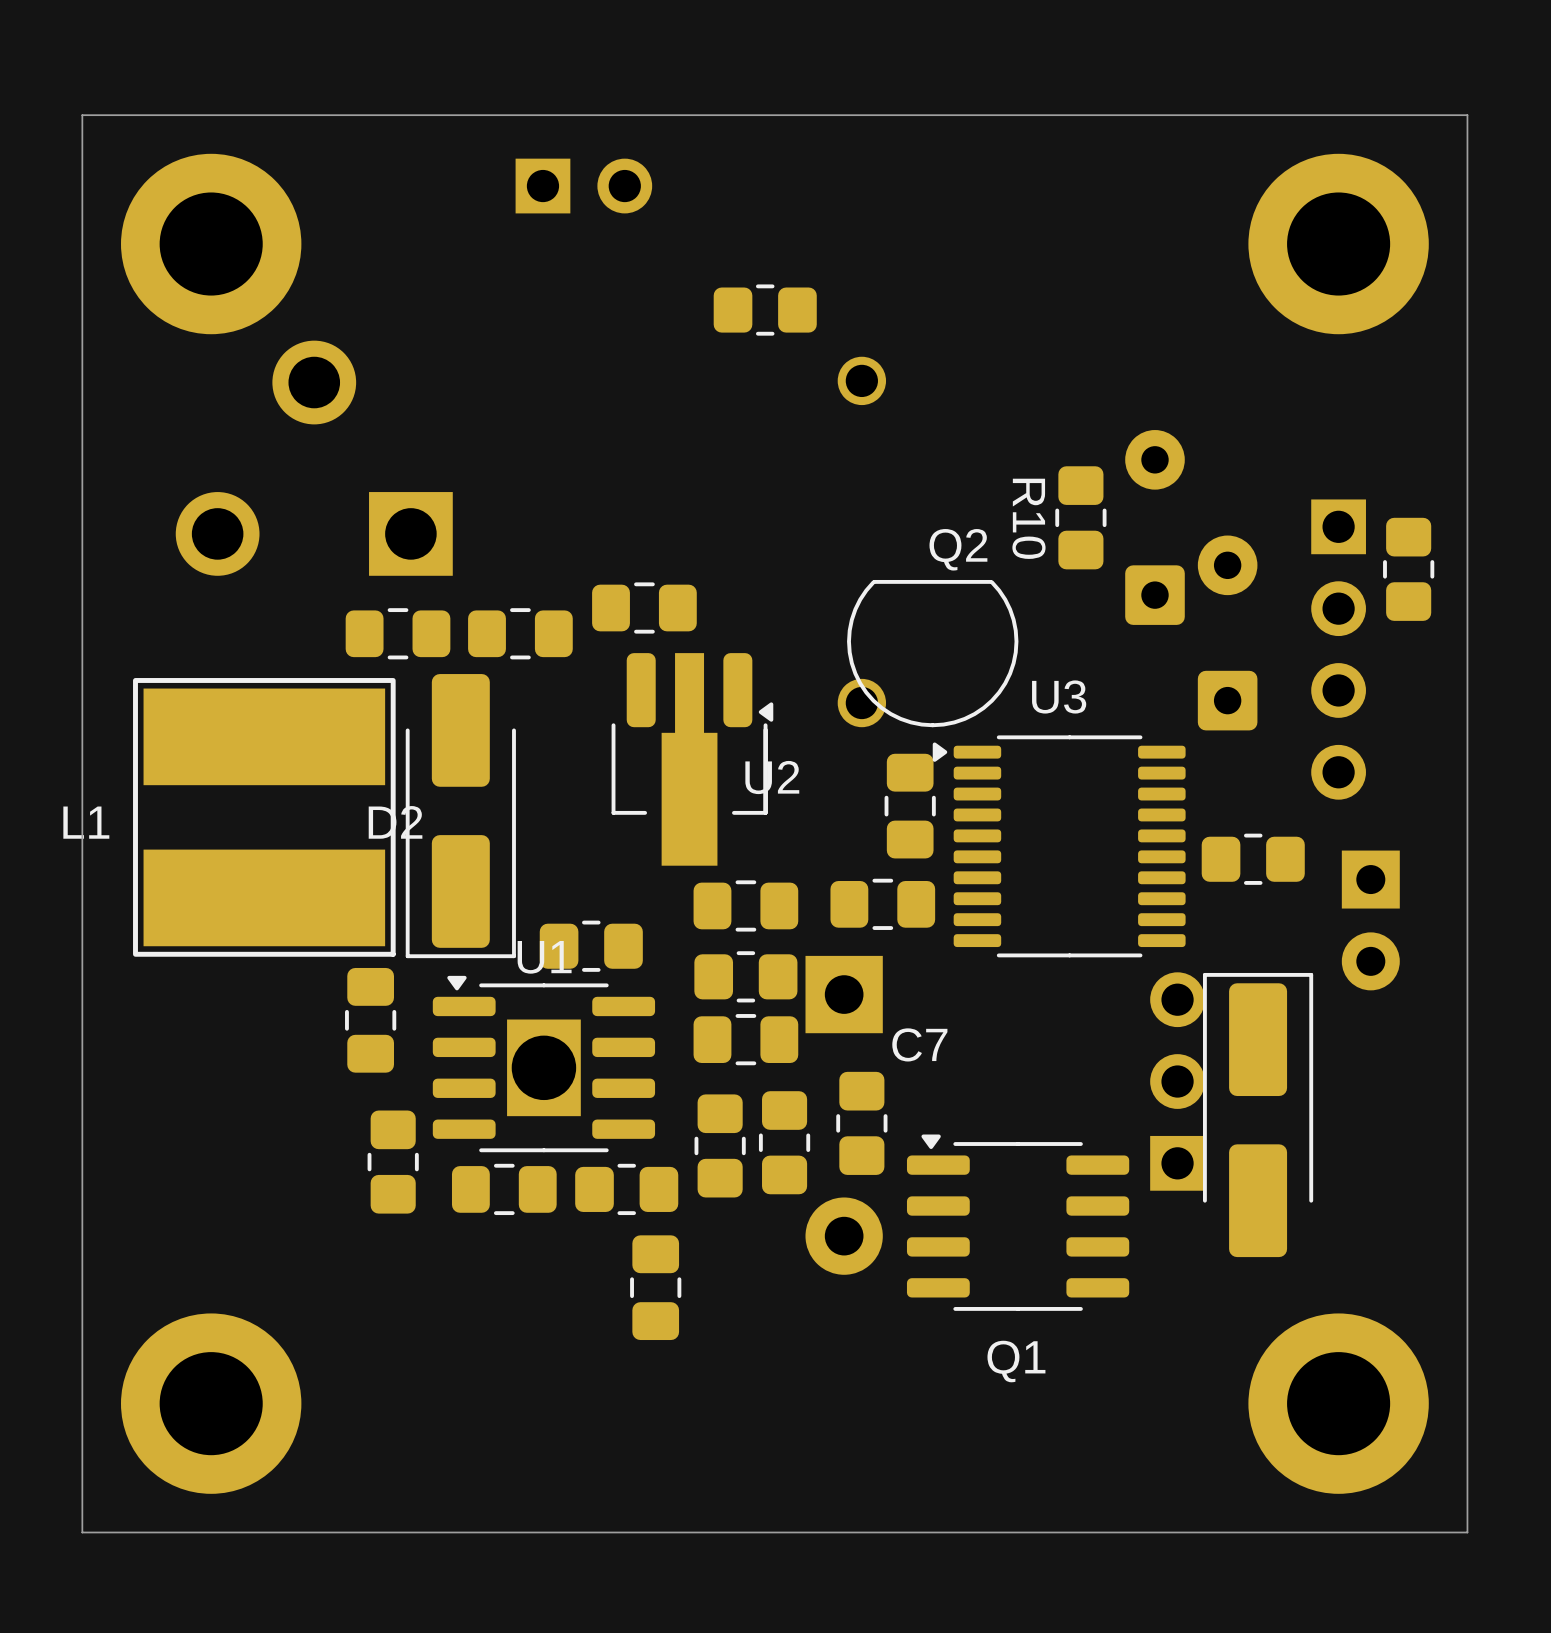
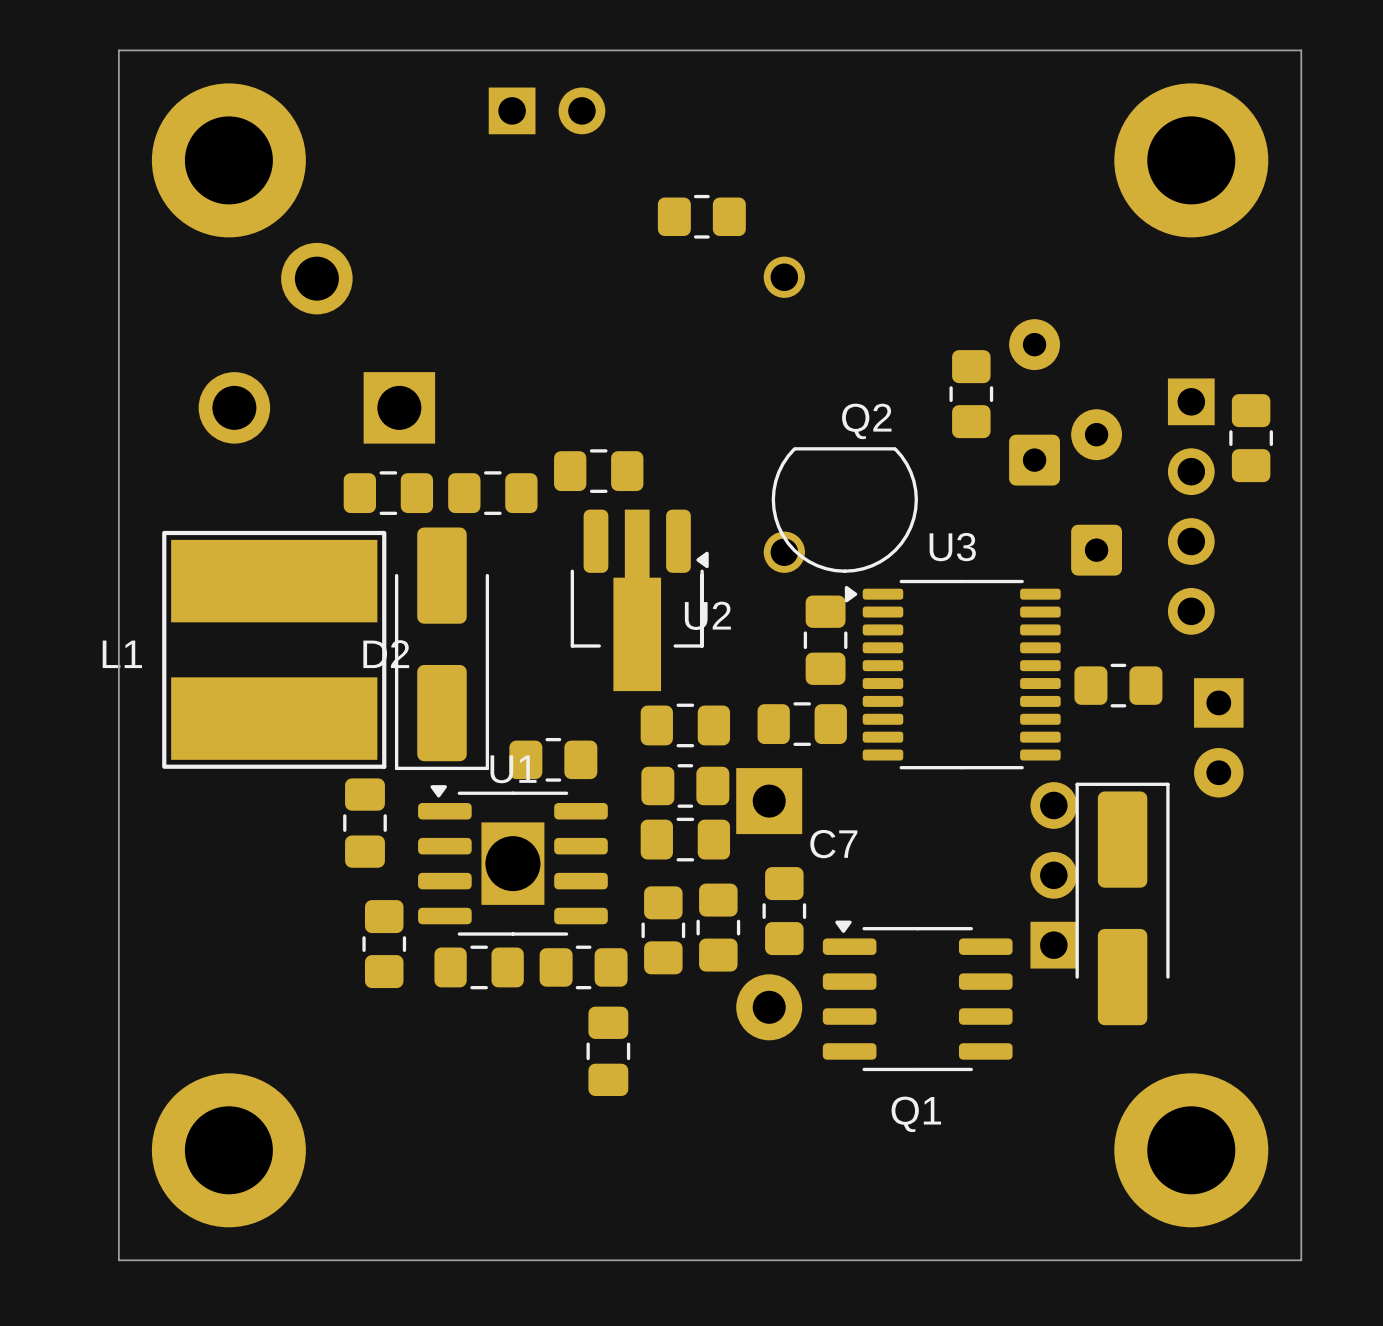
R10 name: R10 (1028, 518) -> none

